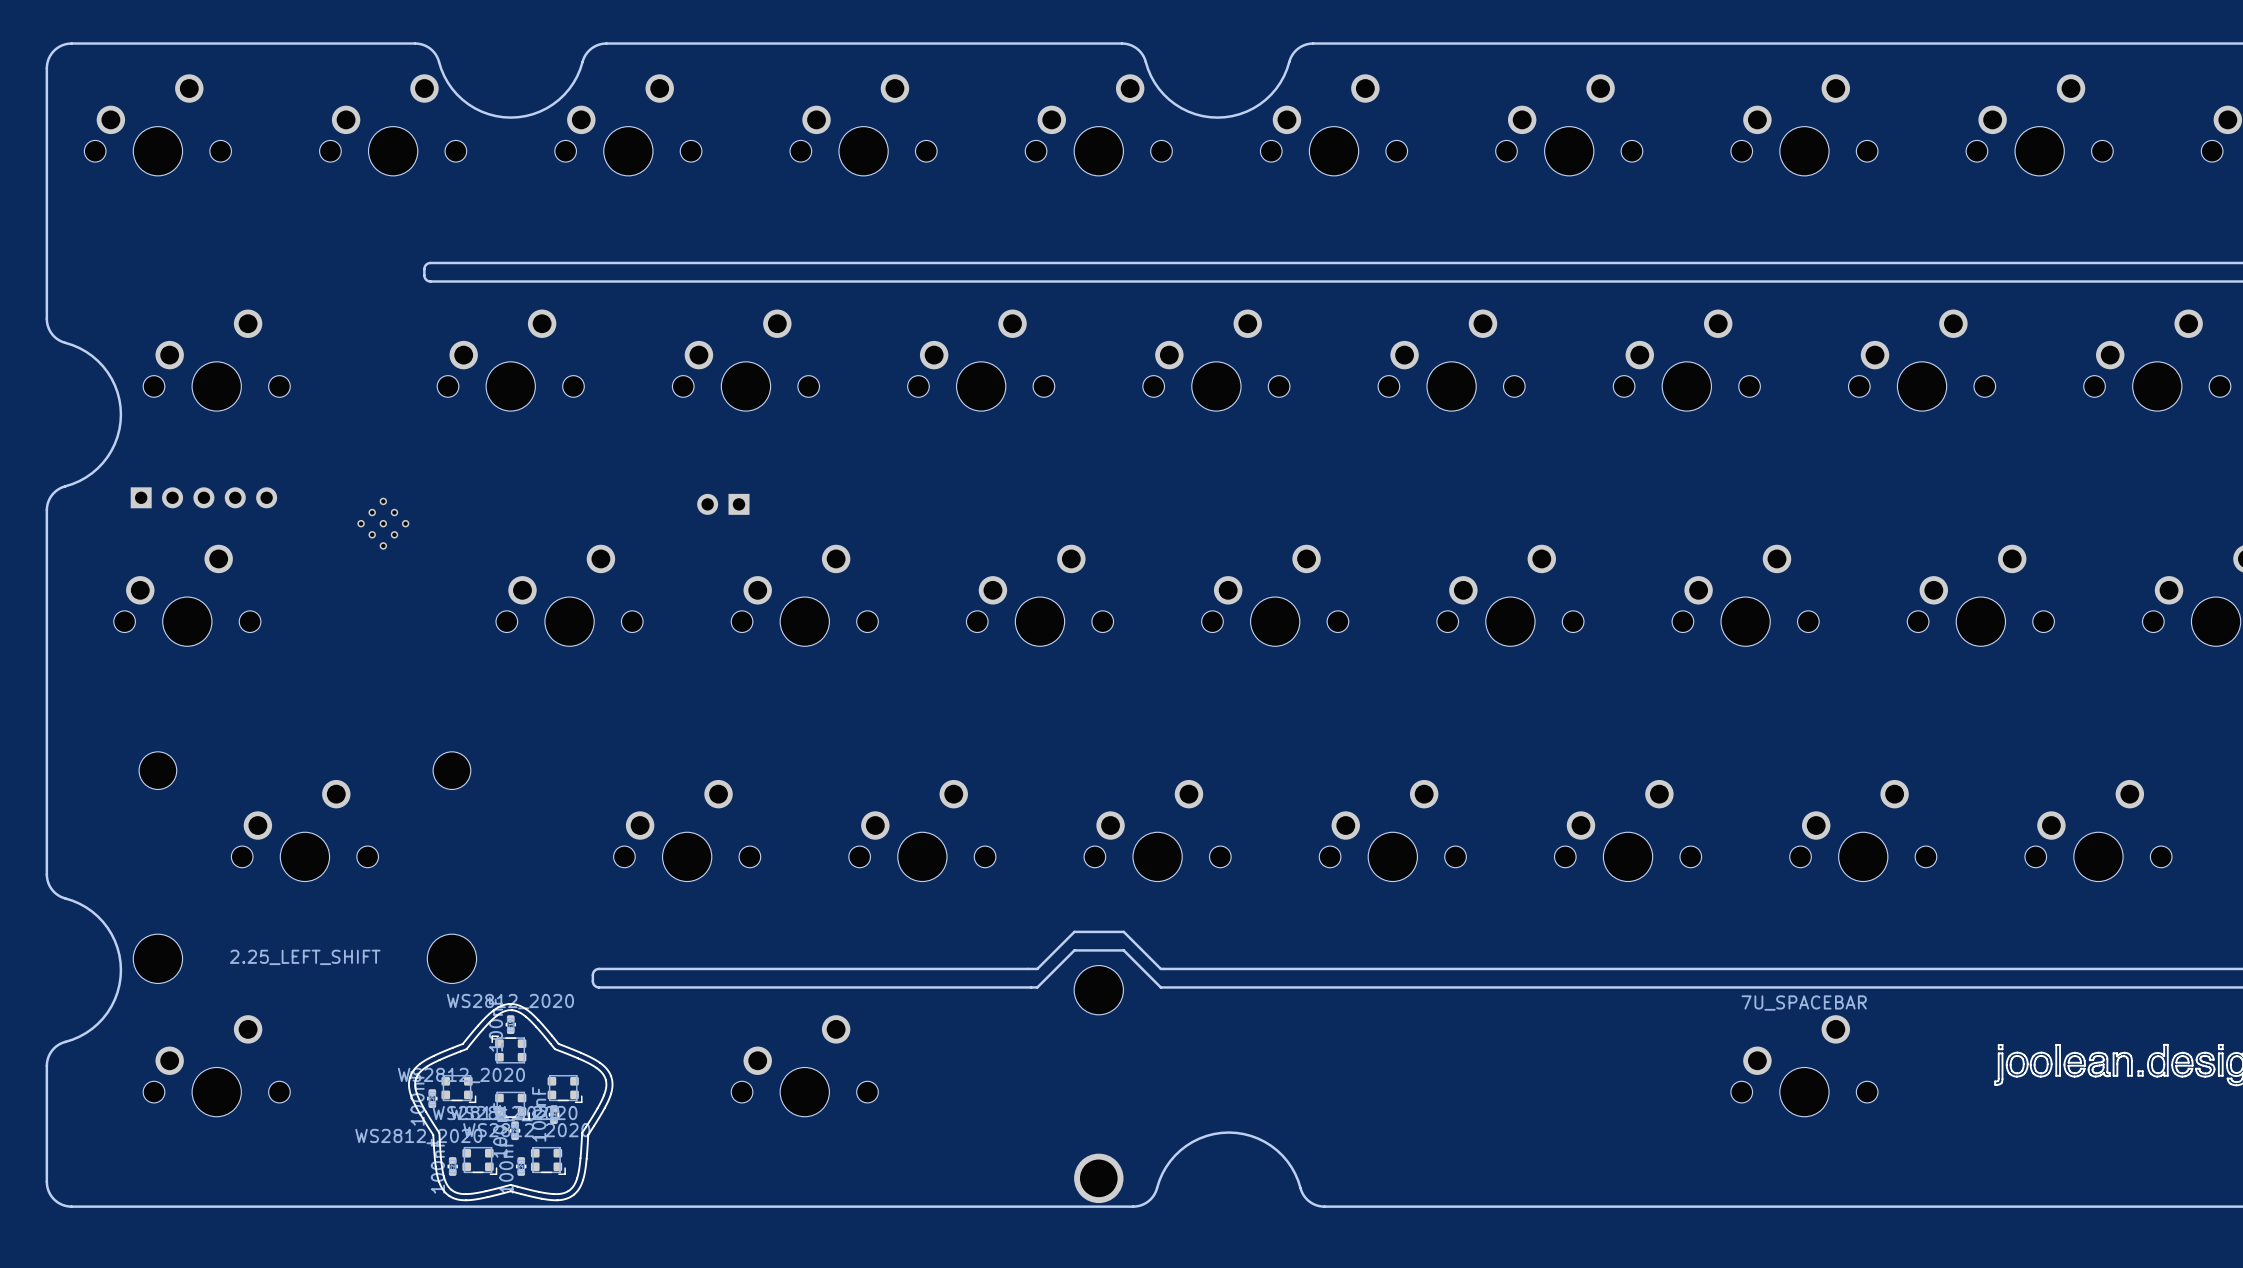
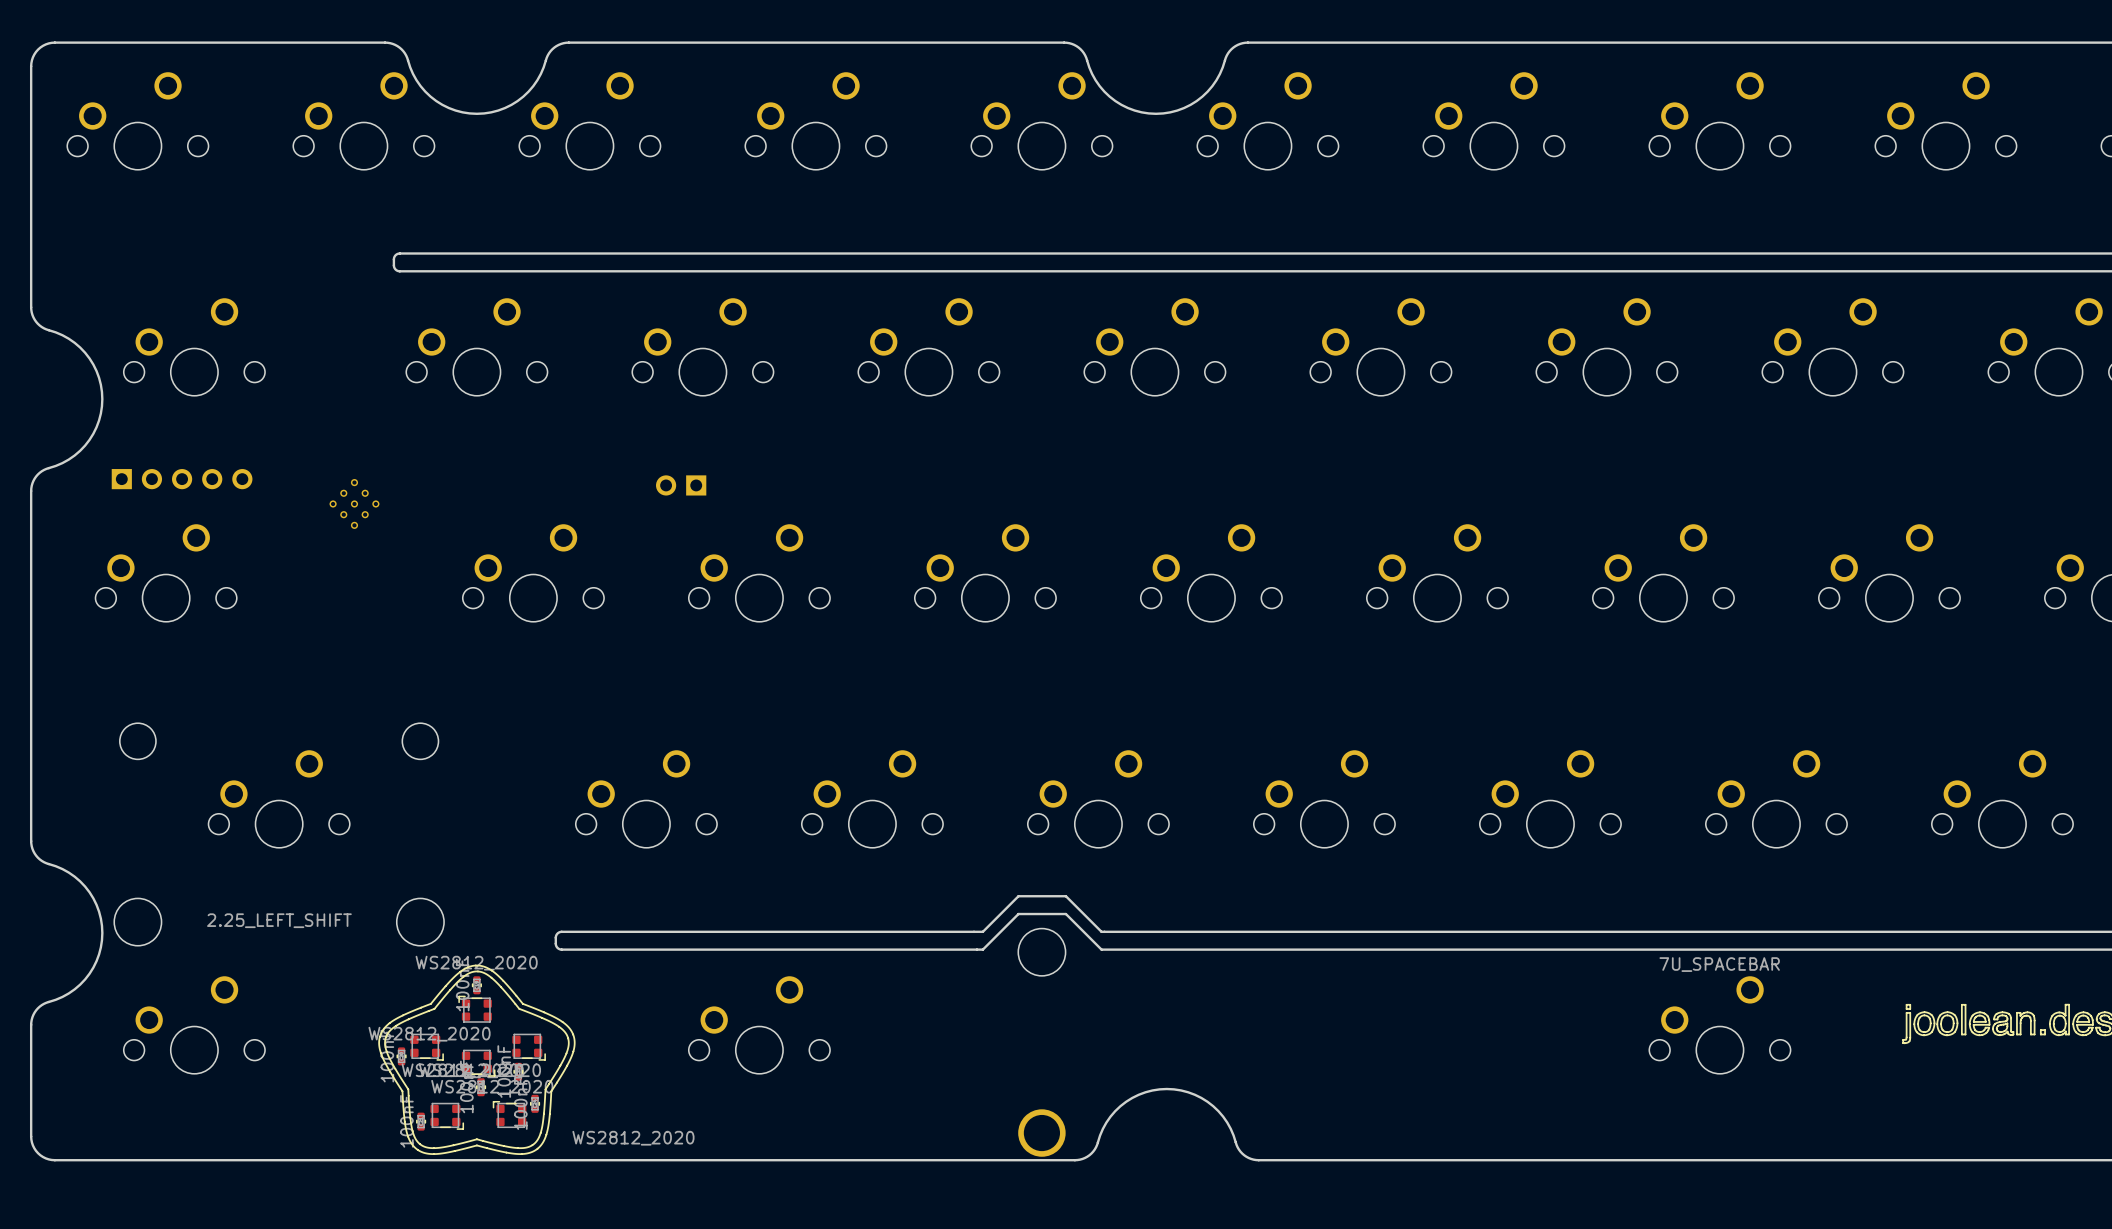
part rotation: 0° (548, 1160) -> 180° (509, 1114)
part position: (521, 1166) -> (535, 1103)

